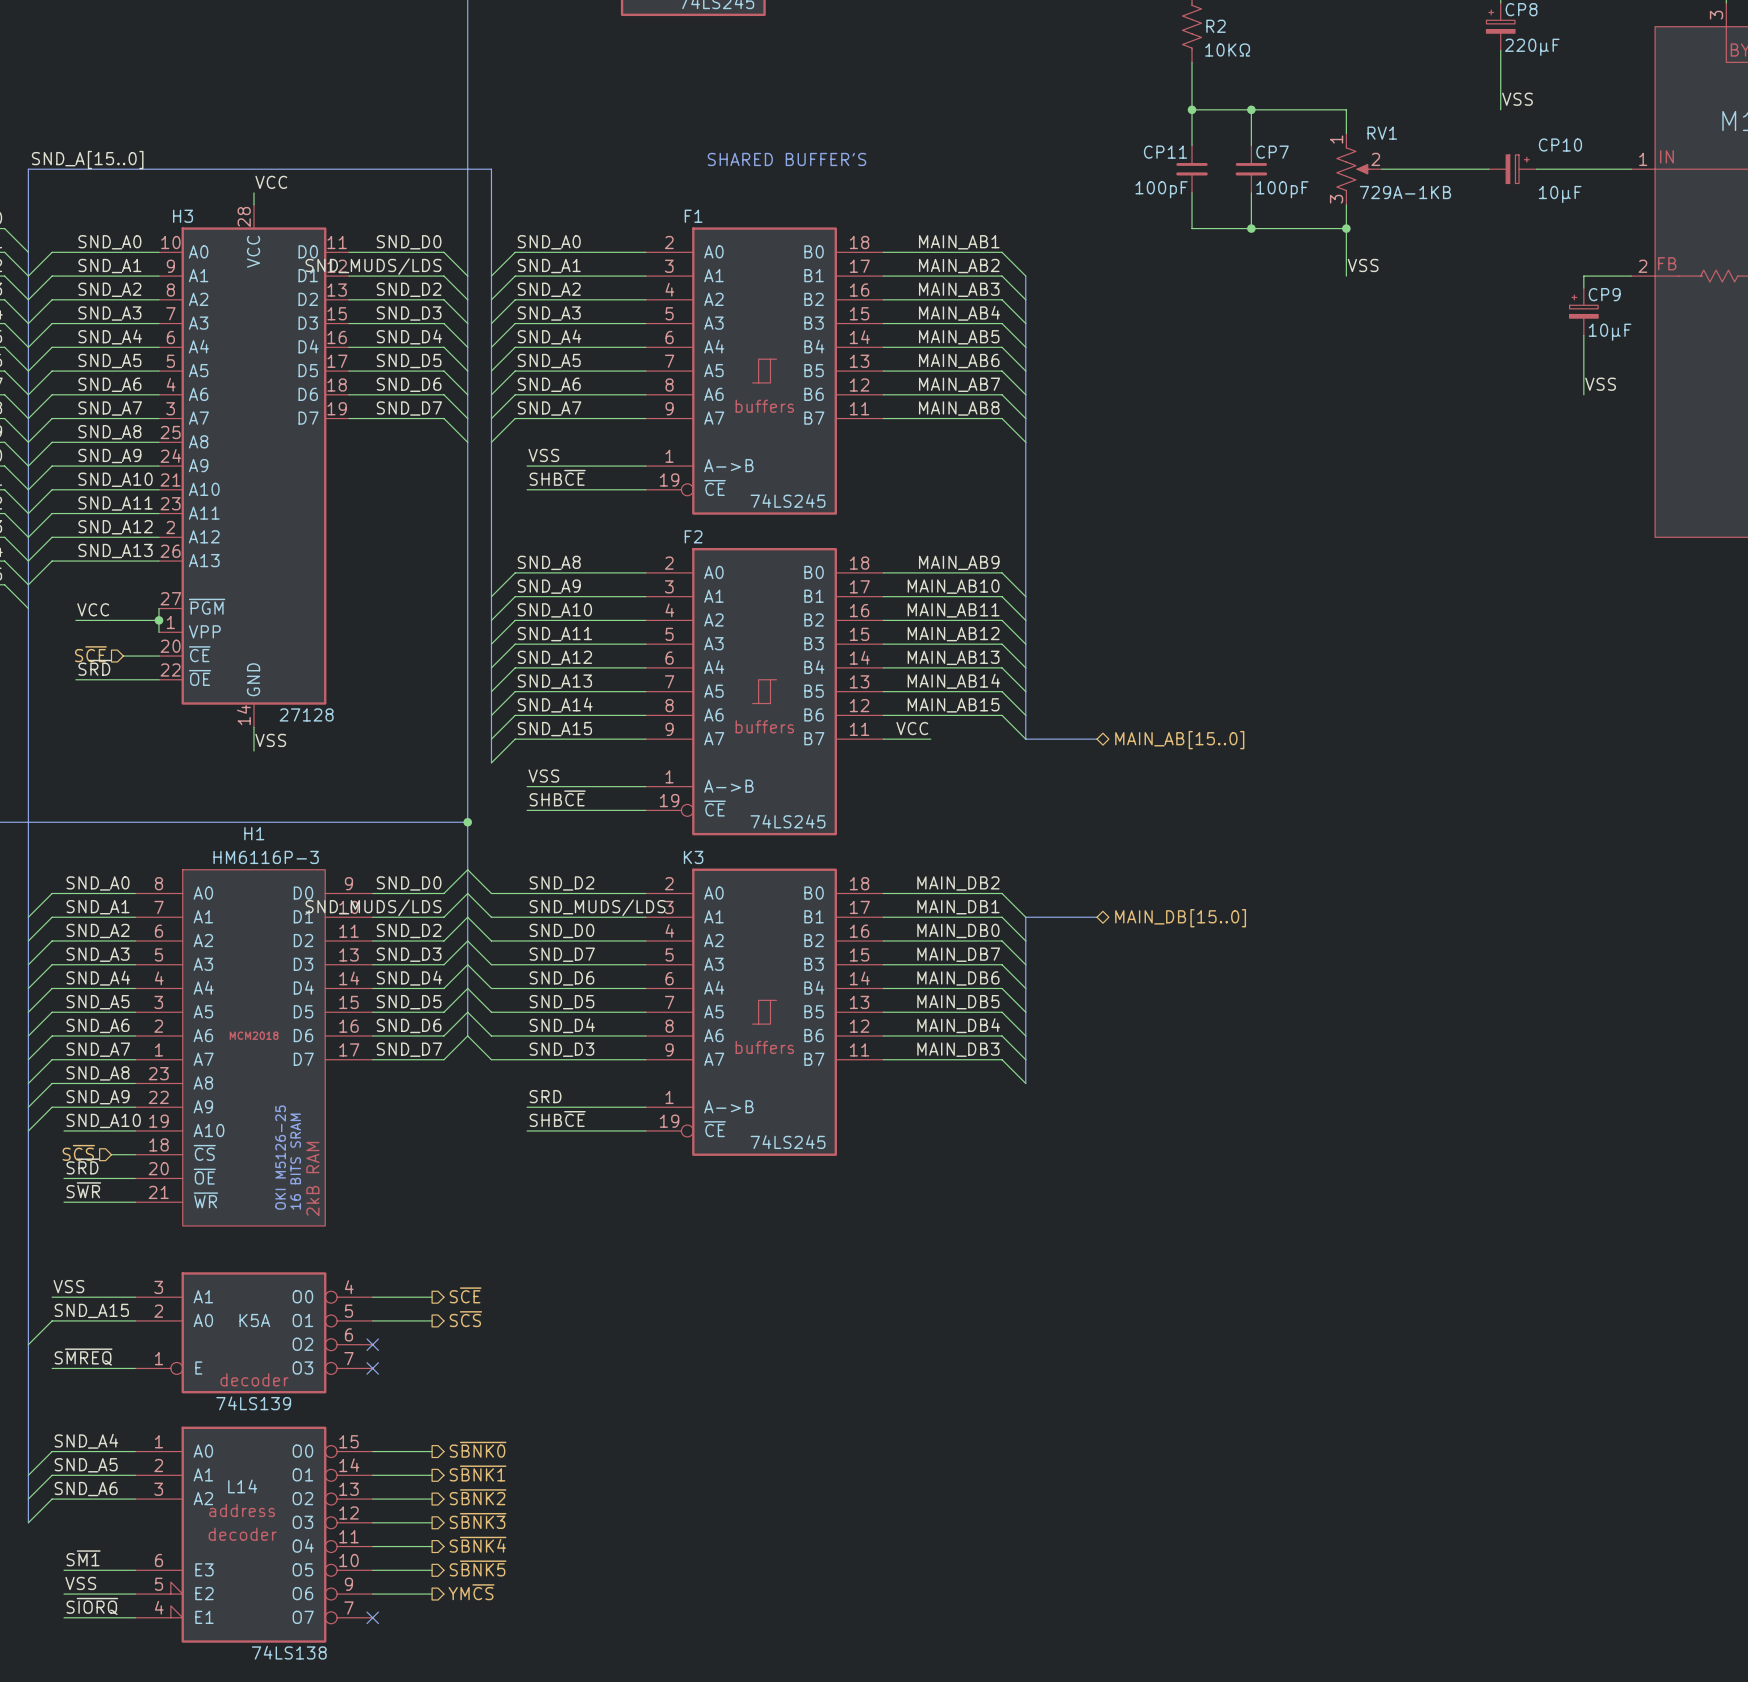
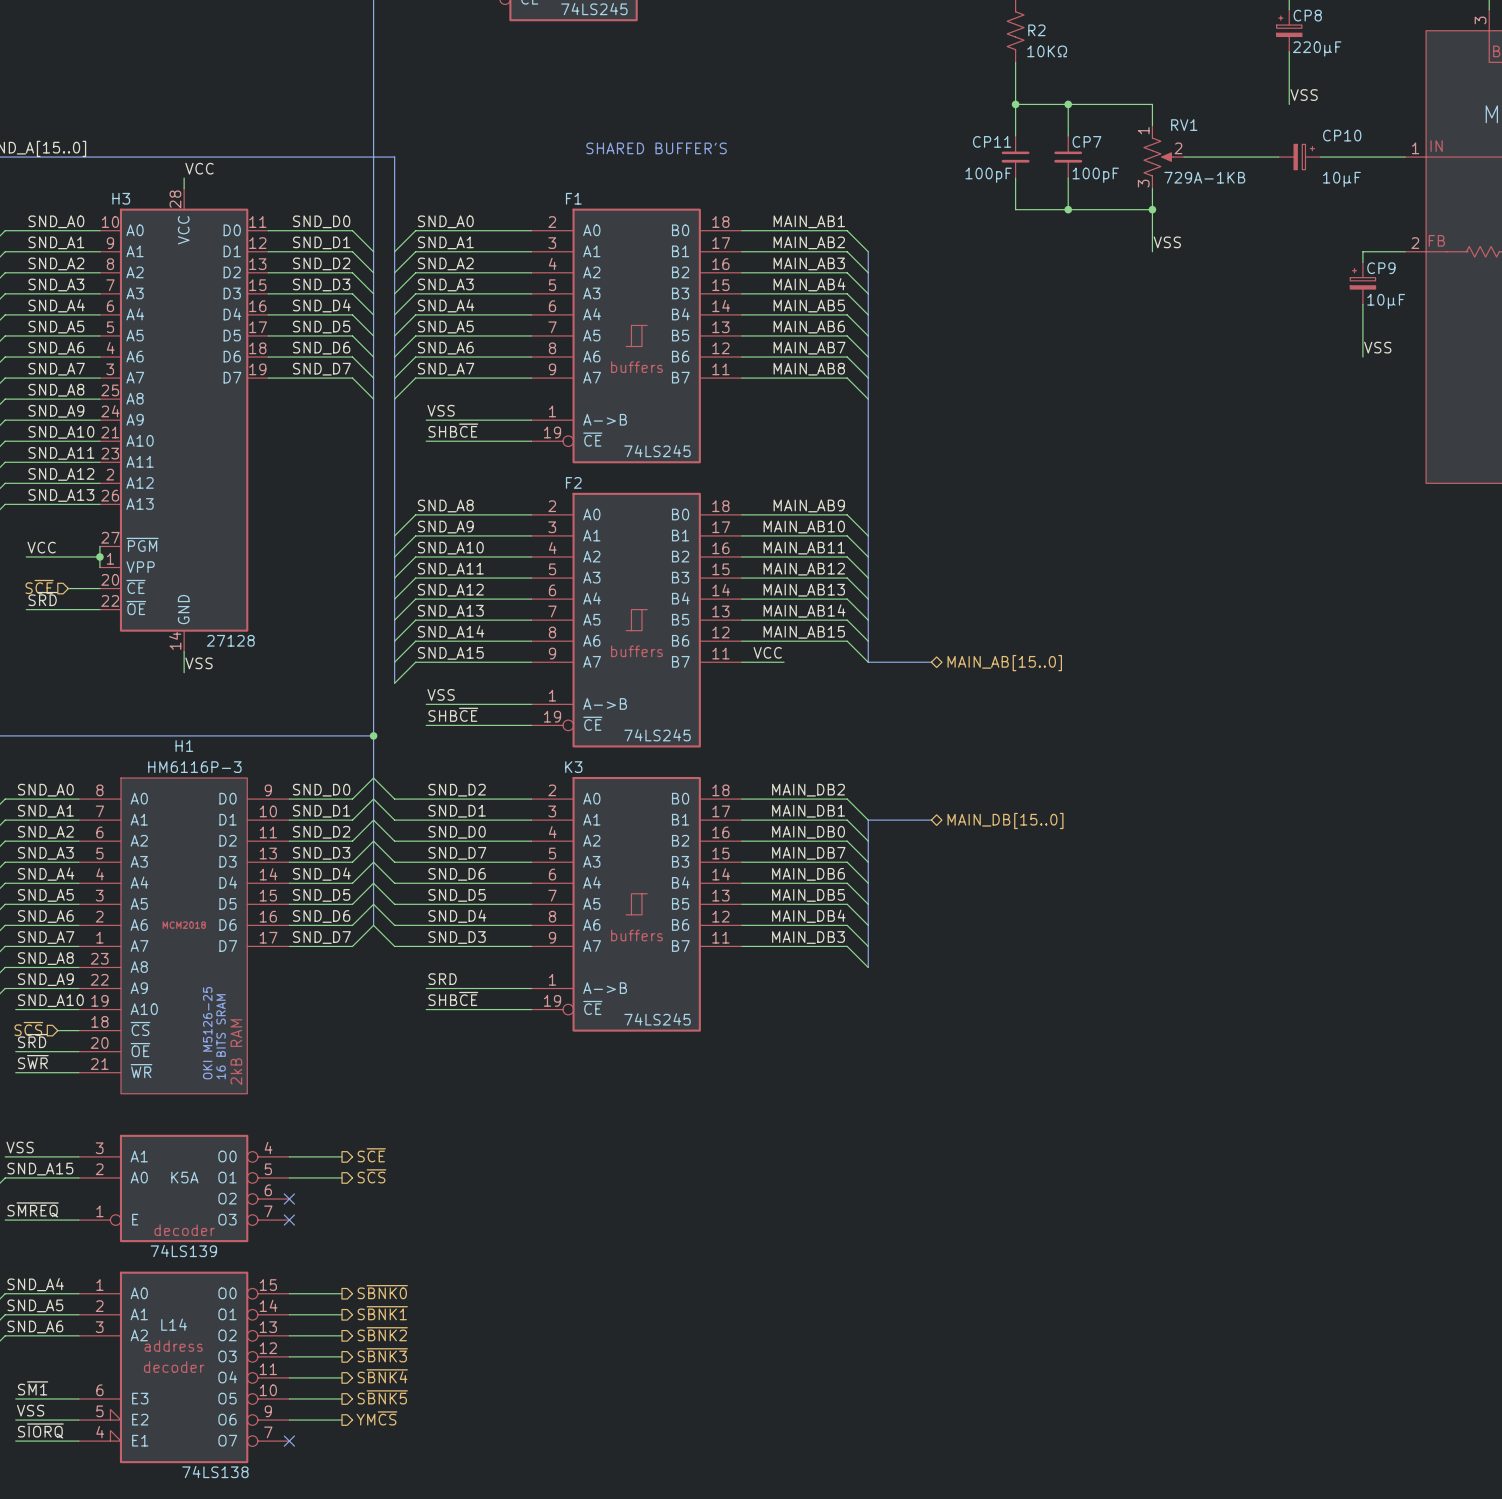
label: SND_MUDS/LDS (373, 266) -> SND_D1 (321, 242)
label: SND_MUDS/LDS (373, 907) -> SND_D1 (321, 811)
label: SND_MUDS/LDS (597, 907) -> SND_D1 (457, 811)

